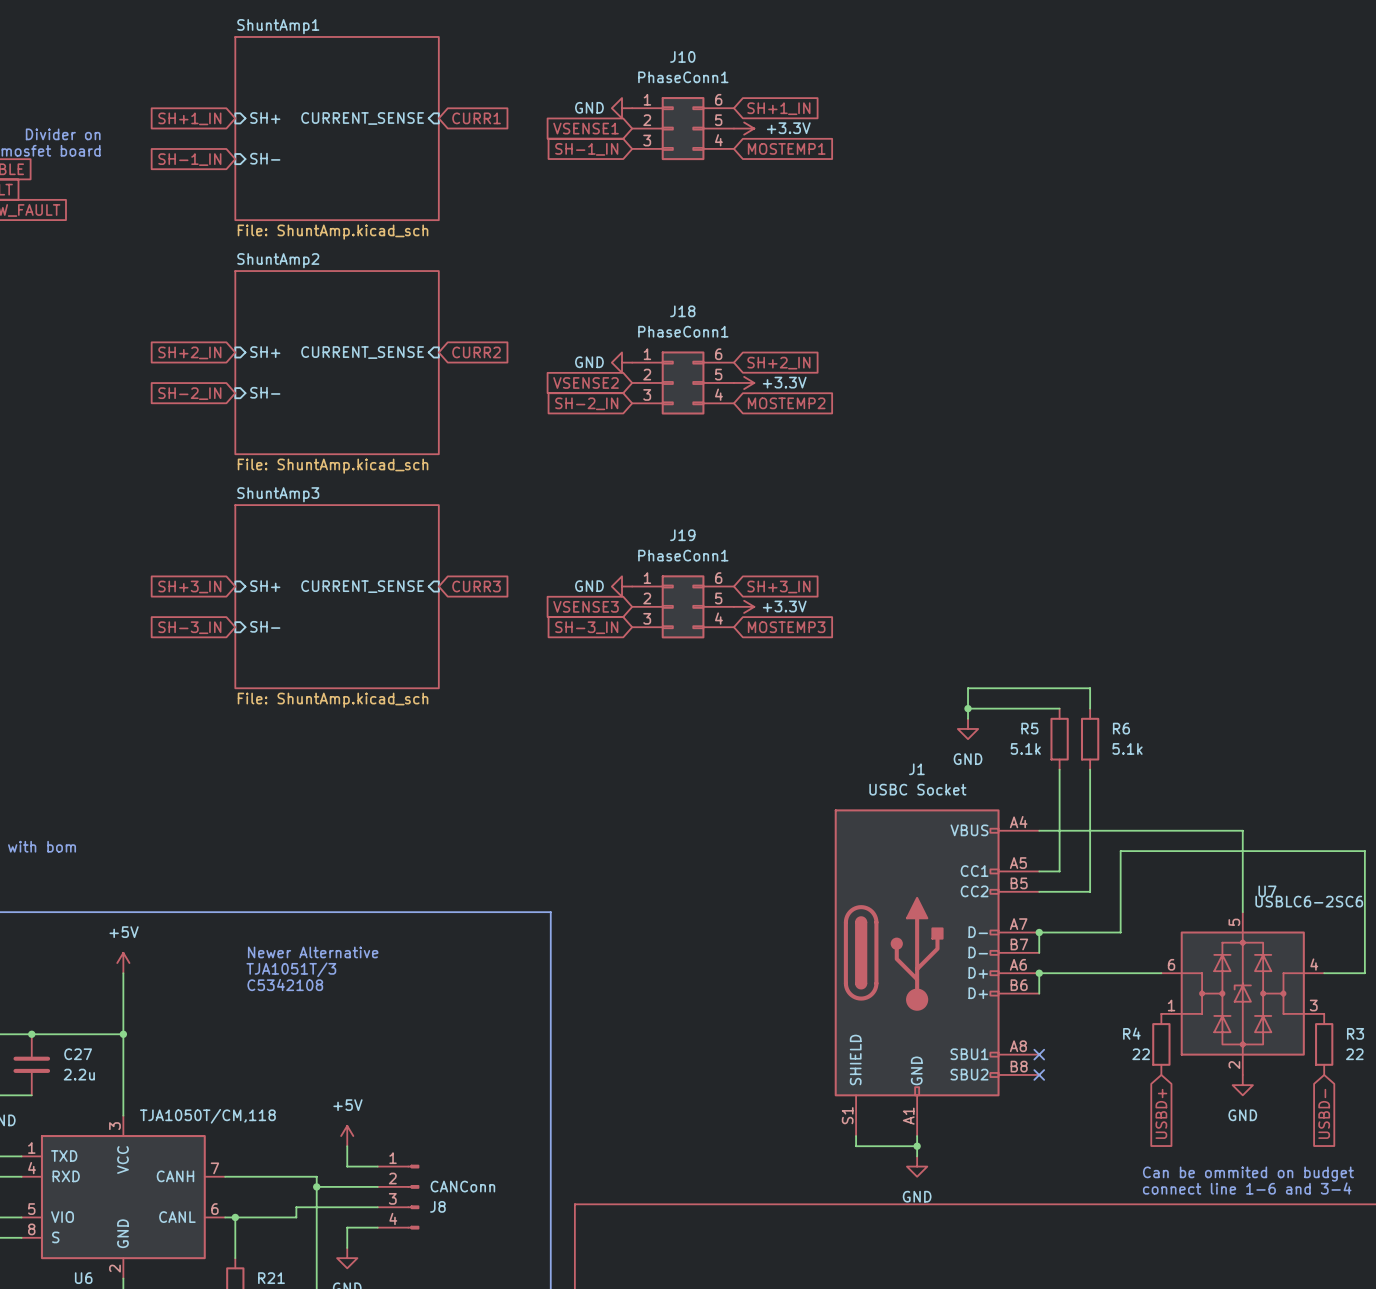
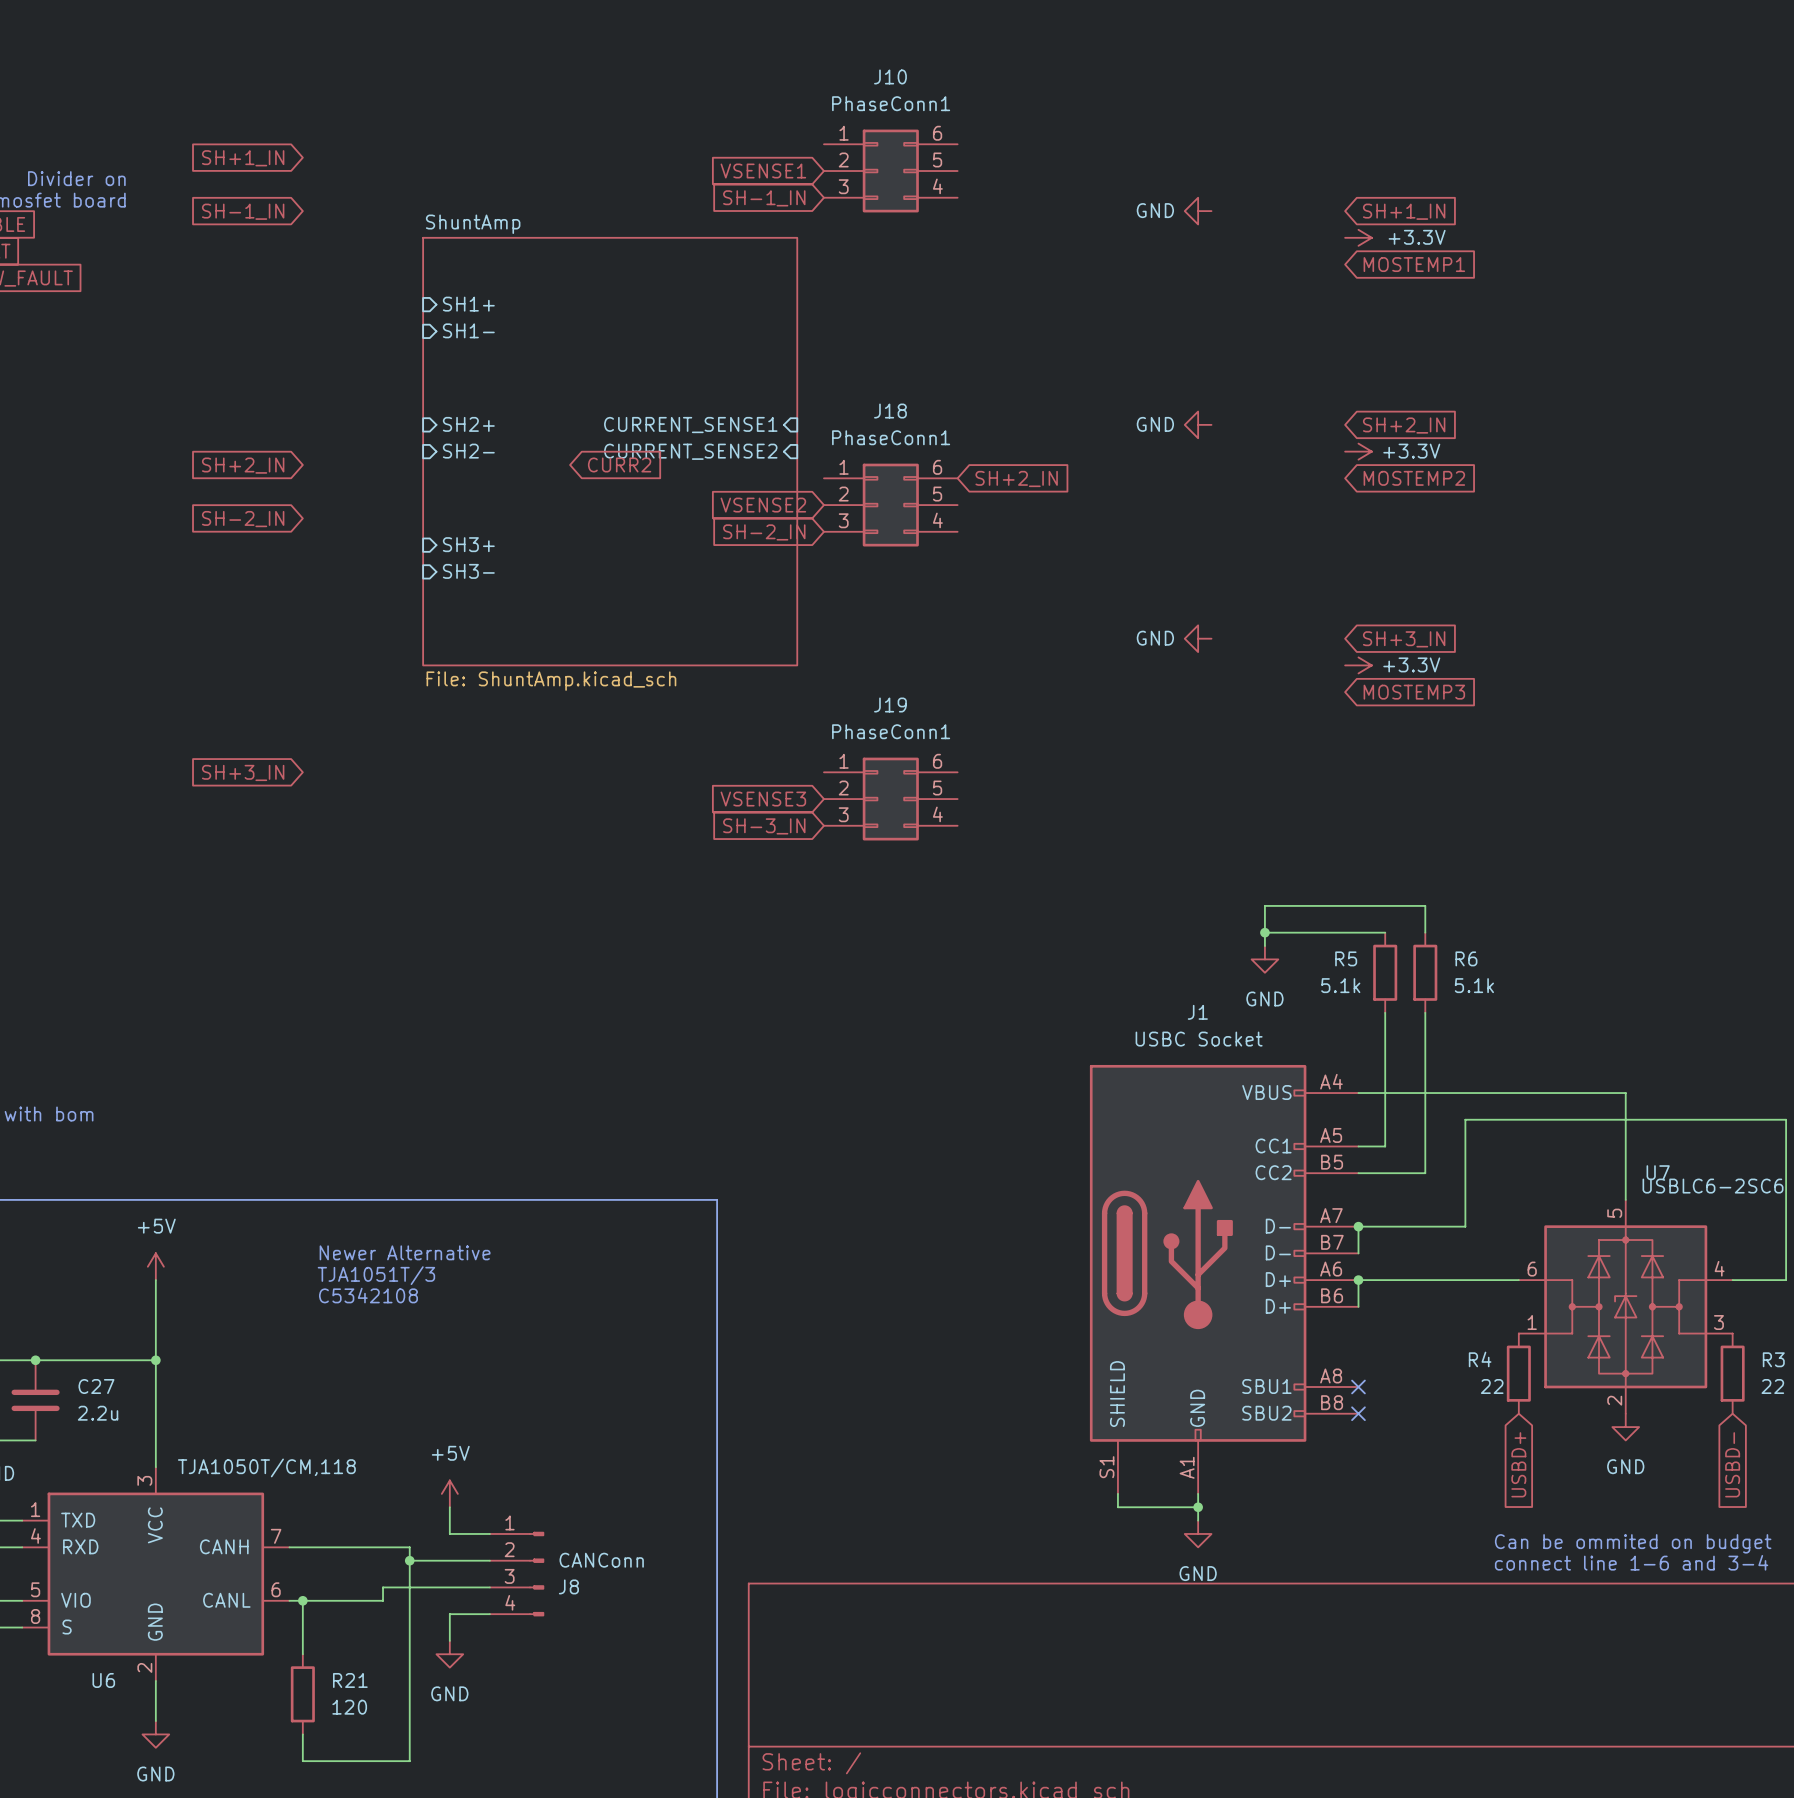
power symbol: GND (622, 108) -> none
global label: SH+1_IN (778, 108) -> none
sheet pin: SH+ (265, 118) -> none
sheet pin: CURRENT_SENSE (362, 118) -> none
global label: CURR1 (476, 118) -> none
sheet ShuntAmp1: File: ShuntAmp.kicad_sch (337, 128) -> none
power symbol: +3.3V (744, 128) -> none
global label: MOSTEMP1 (786, 148) -> none
sheet pin: SH- (265, 158) -> none
power symbol: none -> GND (1198, 211)
global label: none -> SH+1_IN (1404, 211)
power symbol: none -> +3.3V (1358, 237)
global label: none -> MOSTEMP1 (1414, 264)
sheet pin: none -> SH1+ (468, 304)
sheet pin: none -> SH1- (468, 330)
sheet pin: none -> SH2+ (468, 424)
power symbol: none -> GND (1198, 424)
sheet pin: none -> CURRENT_SENSE1 (690, 425)
global label: none -> SH+2_IN (1404, 425)
sheet pin: none -> SH2- (468, 451)
sheet ShuntAmp: none -> File: ShuntAmp.kicad_sch (610, 451)
sheet pin: none -> CURRENT_SENSE2 (690, 451)
power symbol: none -> +3.3V (1358, 451)
sheet pin: SH+ (265, 352) -> none
sheet pin: CURRENT_SENSE (362, 352) -> none
sheet ShuntAmp2: File: ShuntAmp.kicad_sch (337, 362) -> none
power symbol: GND (622, 362) -> none
global label: none -> MOSTEMP2 (1414, 478)
power symbol: +3.3V (744, 382) -> none
sheet pin: SH- (265, 392) -> none
global label: MOSTEMP2 (786, 403) -> none
sheet pin: none -> SH3+ (468, 544)
sheet pin: none -> SH3- (468, 571)
power symbol: none -> GND (1198, 638)
global label: none -> SH+3_IN (1404, 639)
power symbol: none -> +3.3V (1358, 665)
global label: none -> MOSTEMP3 (1414, 692)
sheet pin: SH+ (265, 586) -> none
sheet pin: CURRENT_SENSE (362, 586) -> none
global label: CURR3 (476, 586) -> none
power symbol: GND (622, 586) -> none
global label: SH+3_IN (778, 586) -> none
sheet ShuntAmp3: File: ShuntAmp.kicad_sch (337, 596) -> none
power symbol: +3.3V (744, 606) -> none
sheet pin: SH- (265, 626) -> none
global label: SH-3_IN (189, 627) -> none
global label: MOSTEMP3 (786, 627) -> none

